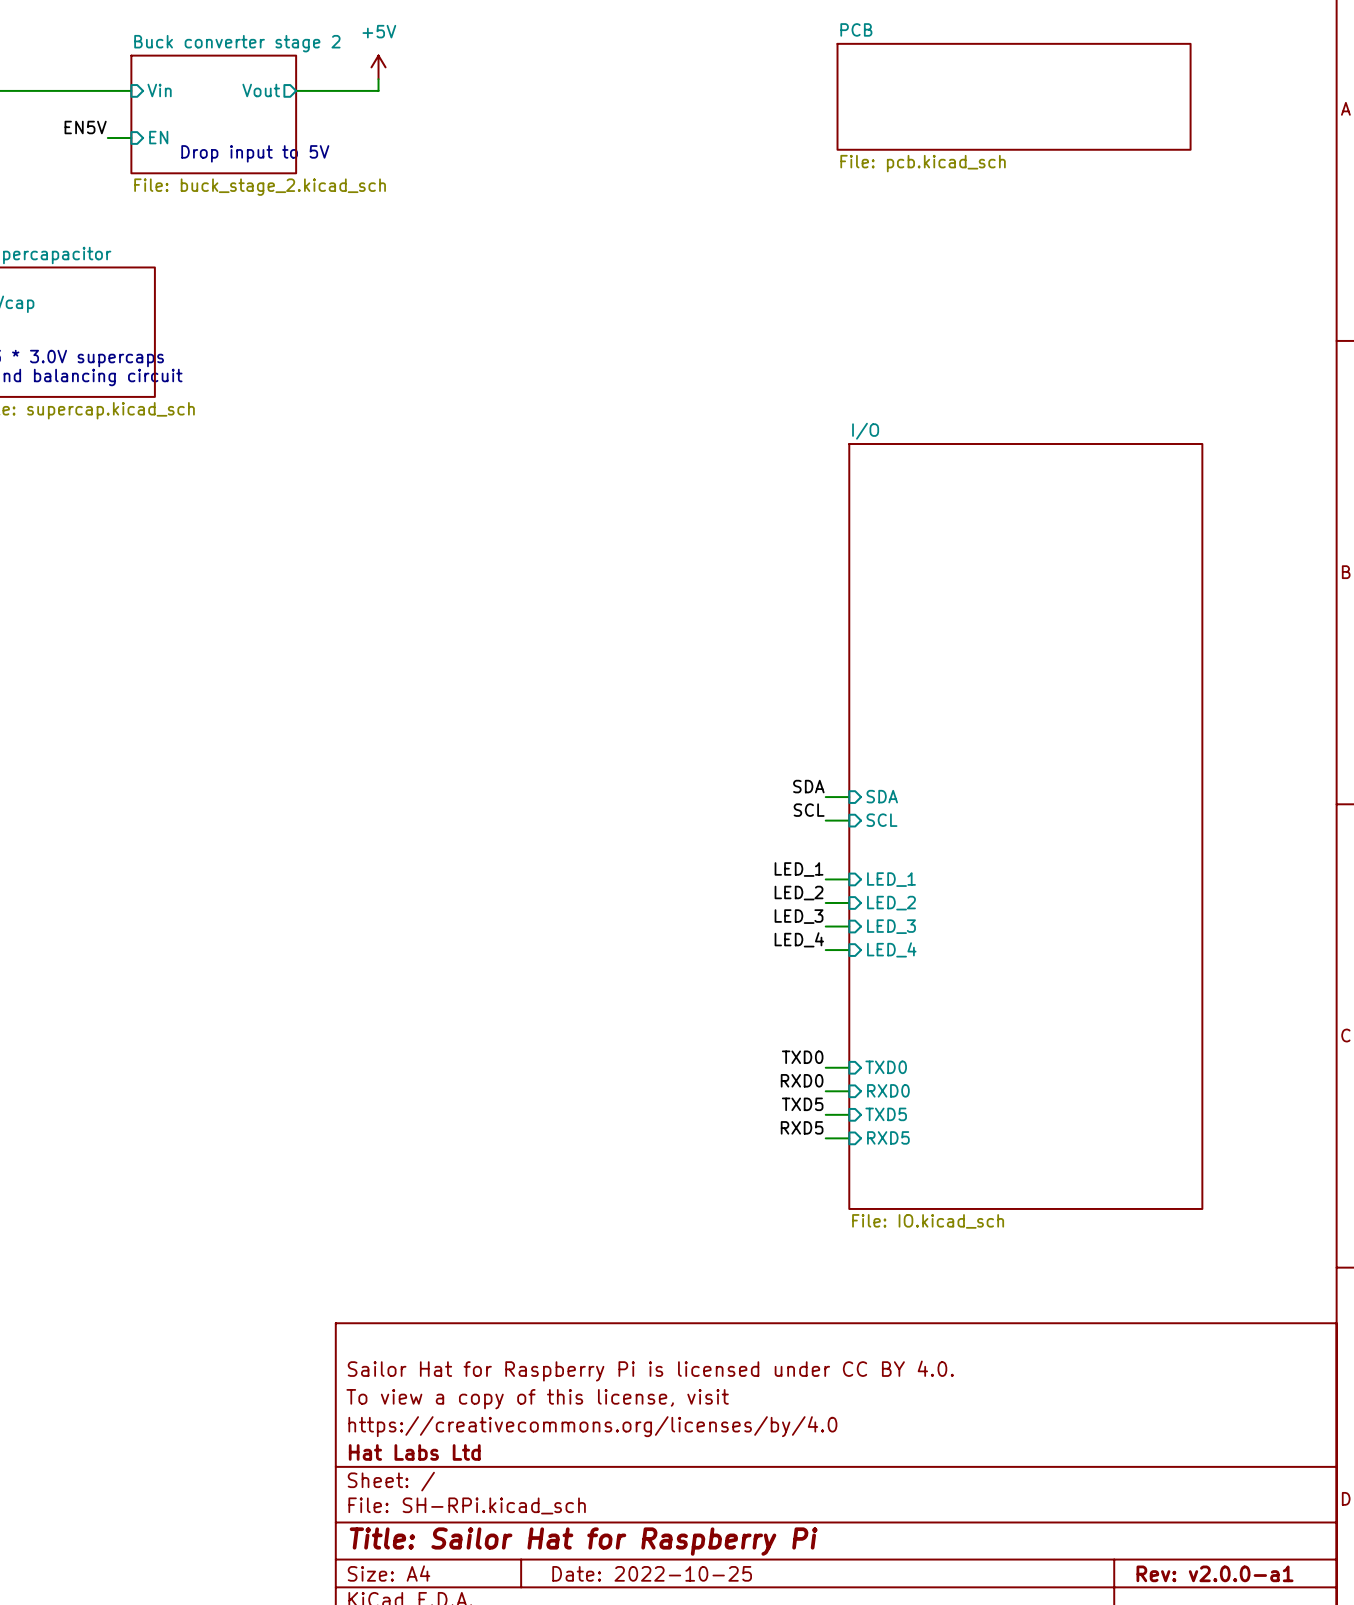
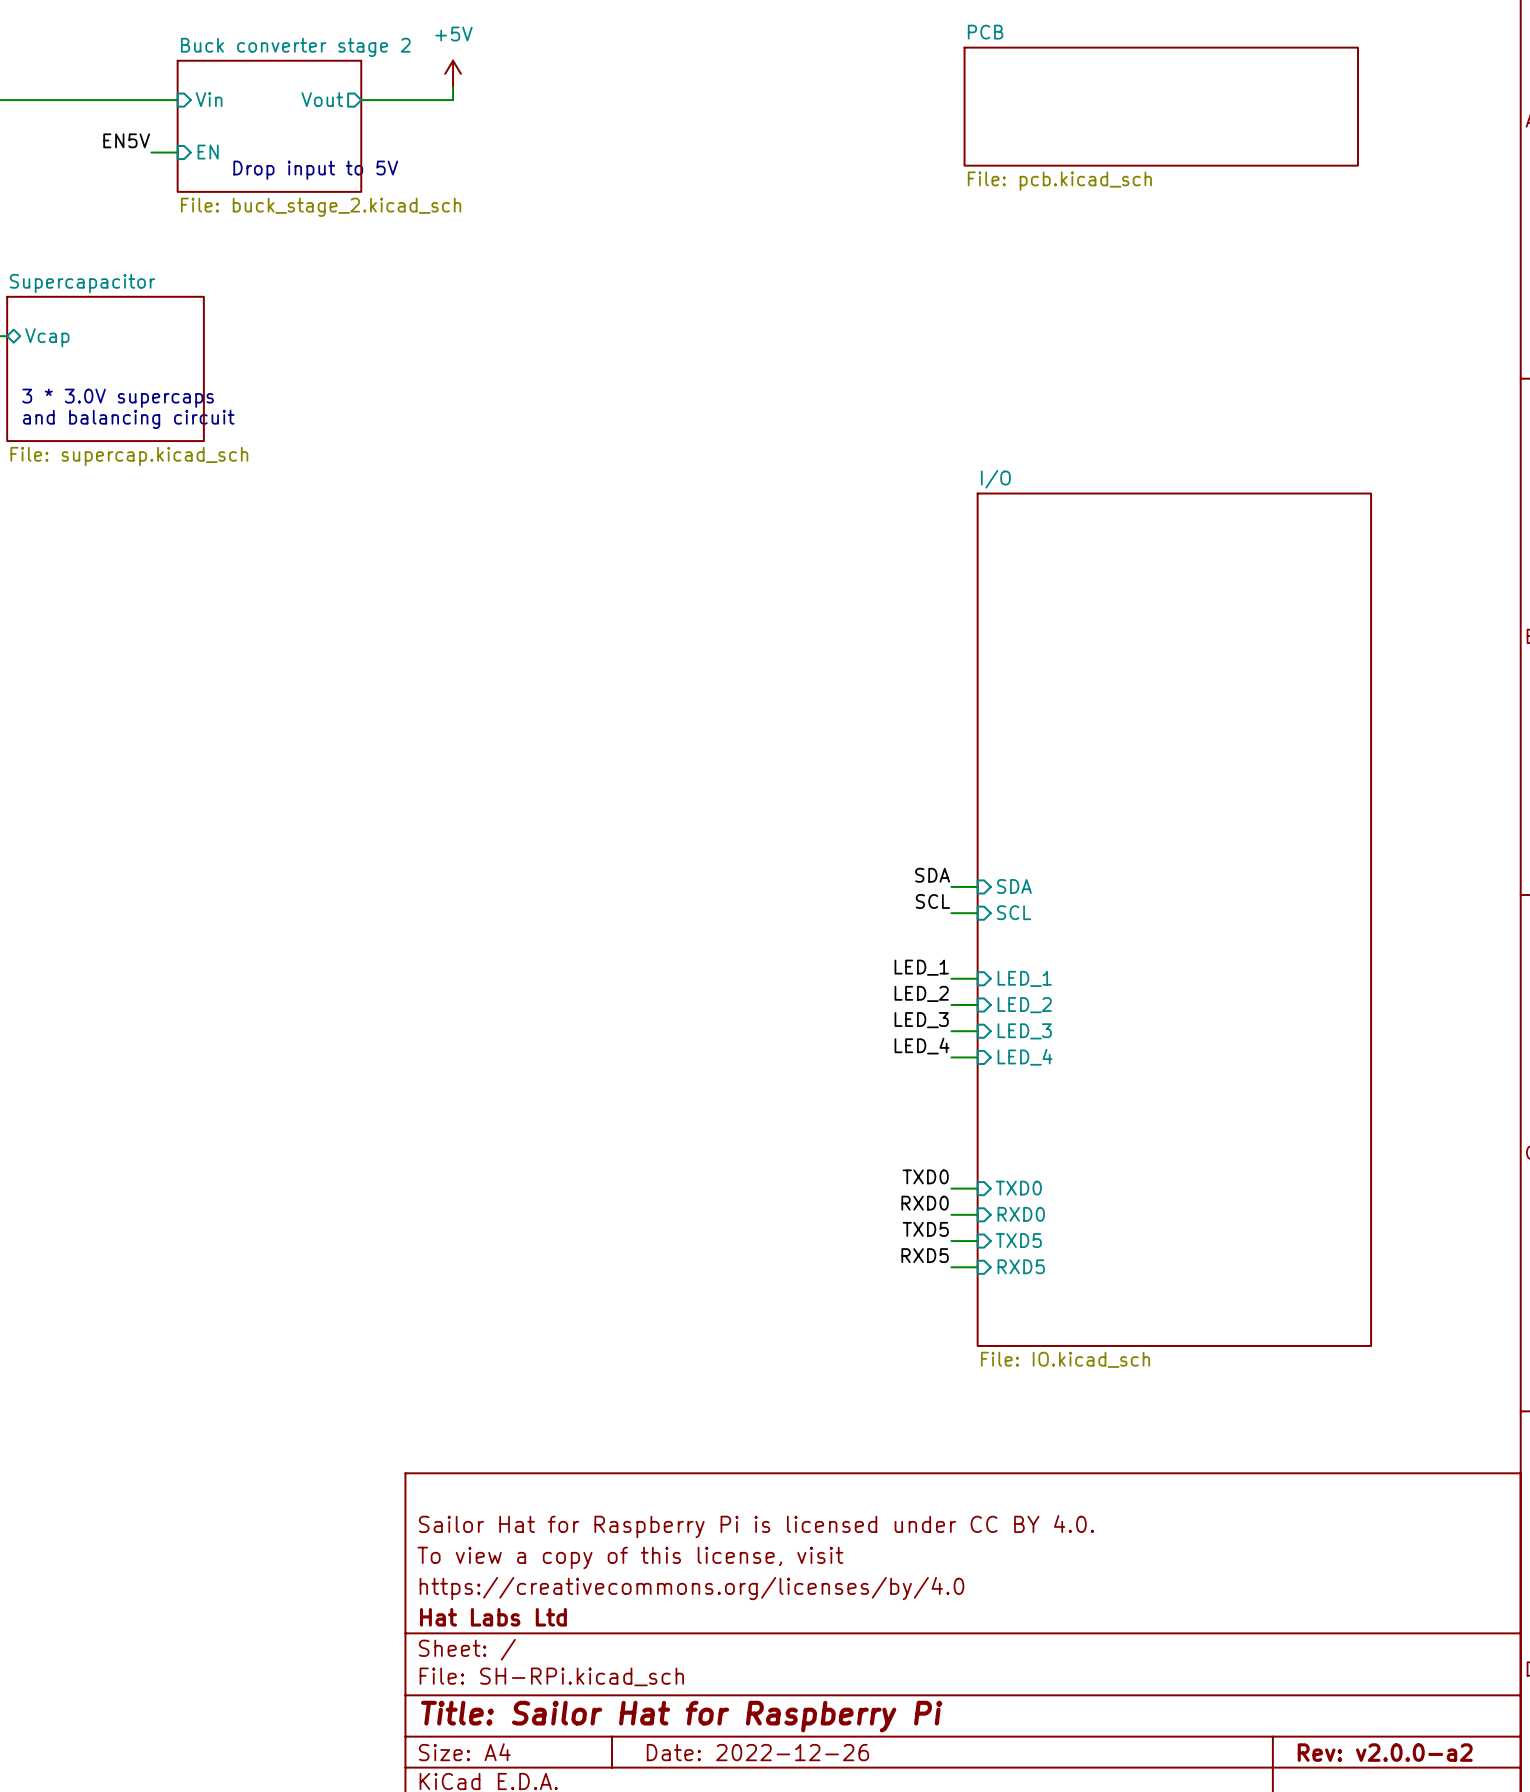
title block: Date: 2022-10-25 (652, 1573) -> Date: 2022-12-26 (757, 1752)
title block: Rev: v2.0.0-a1 (1215, 1573) -> Rev: v2.0.0-a2 (1385, 1752)

